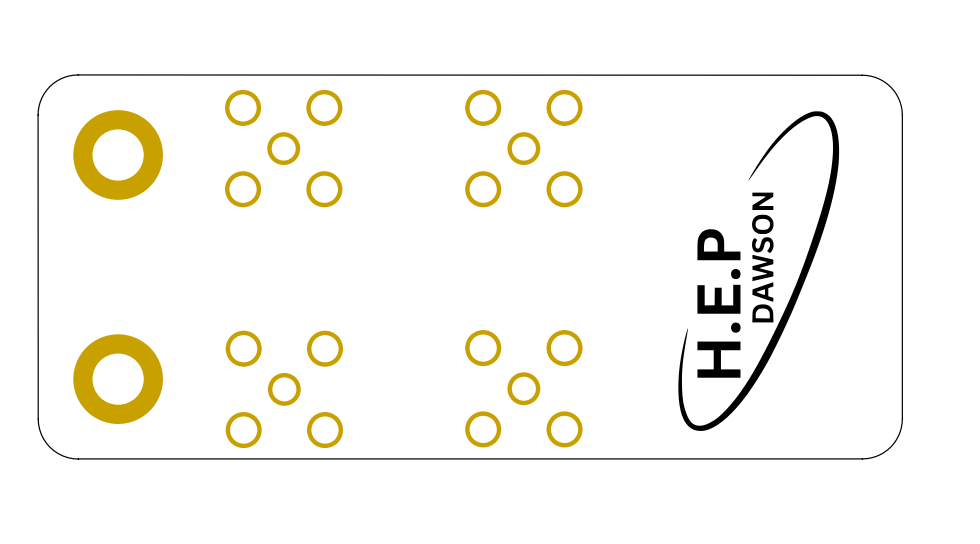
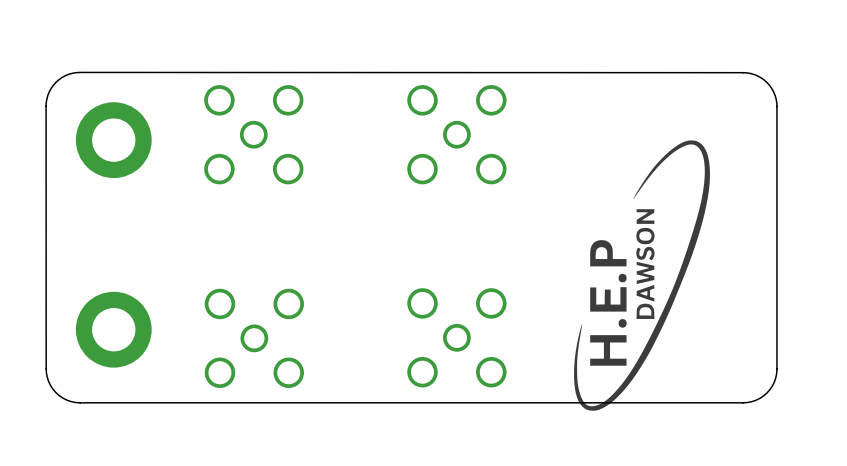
drawing position: (758, 271) -> (641, 275)
board edge: (38, 418) (41, 434) (49, 447) (63, 455) (78, 459) -> none
board edge: (902, 418) (900, 432) (890, 447) (875, 456) (862, 458) (78, 458) -> (776, 363) (775, 377) (769, 389) (760, 398) (743, 402) (80, 402) (63, 398) (53, 389) (47, 377) (46, 363)

